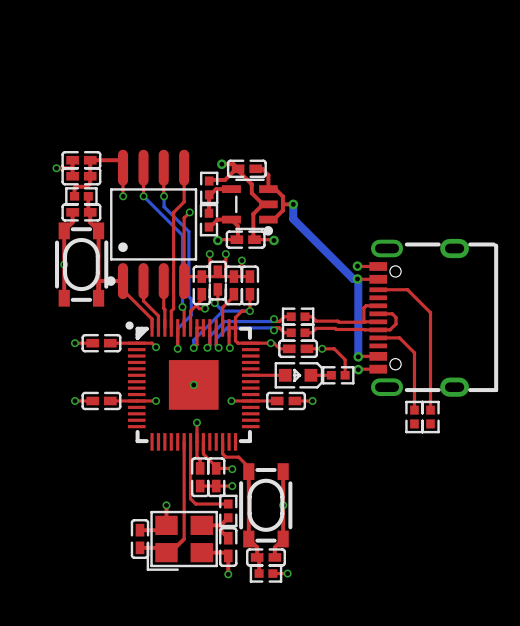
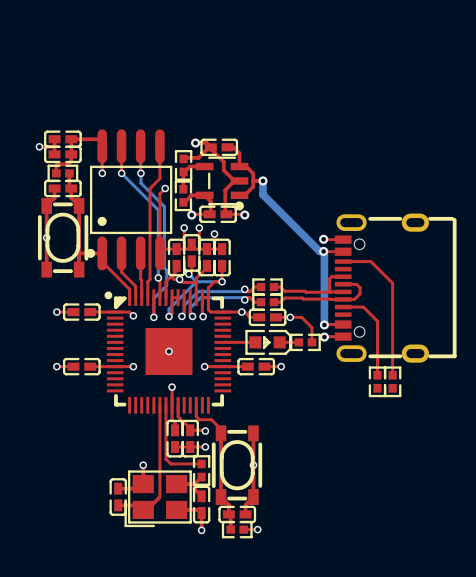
top track: none -> (179, 279) (182, 282) (196, 282)

